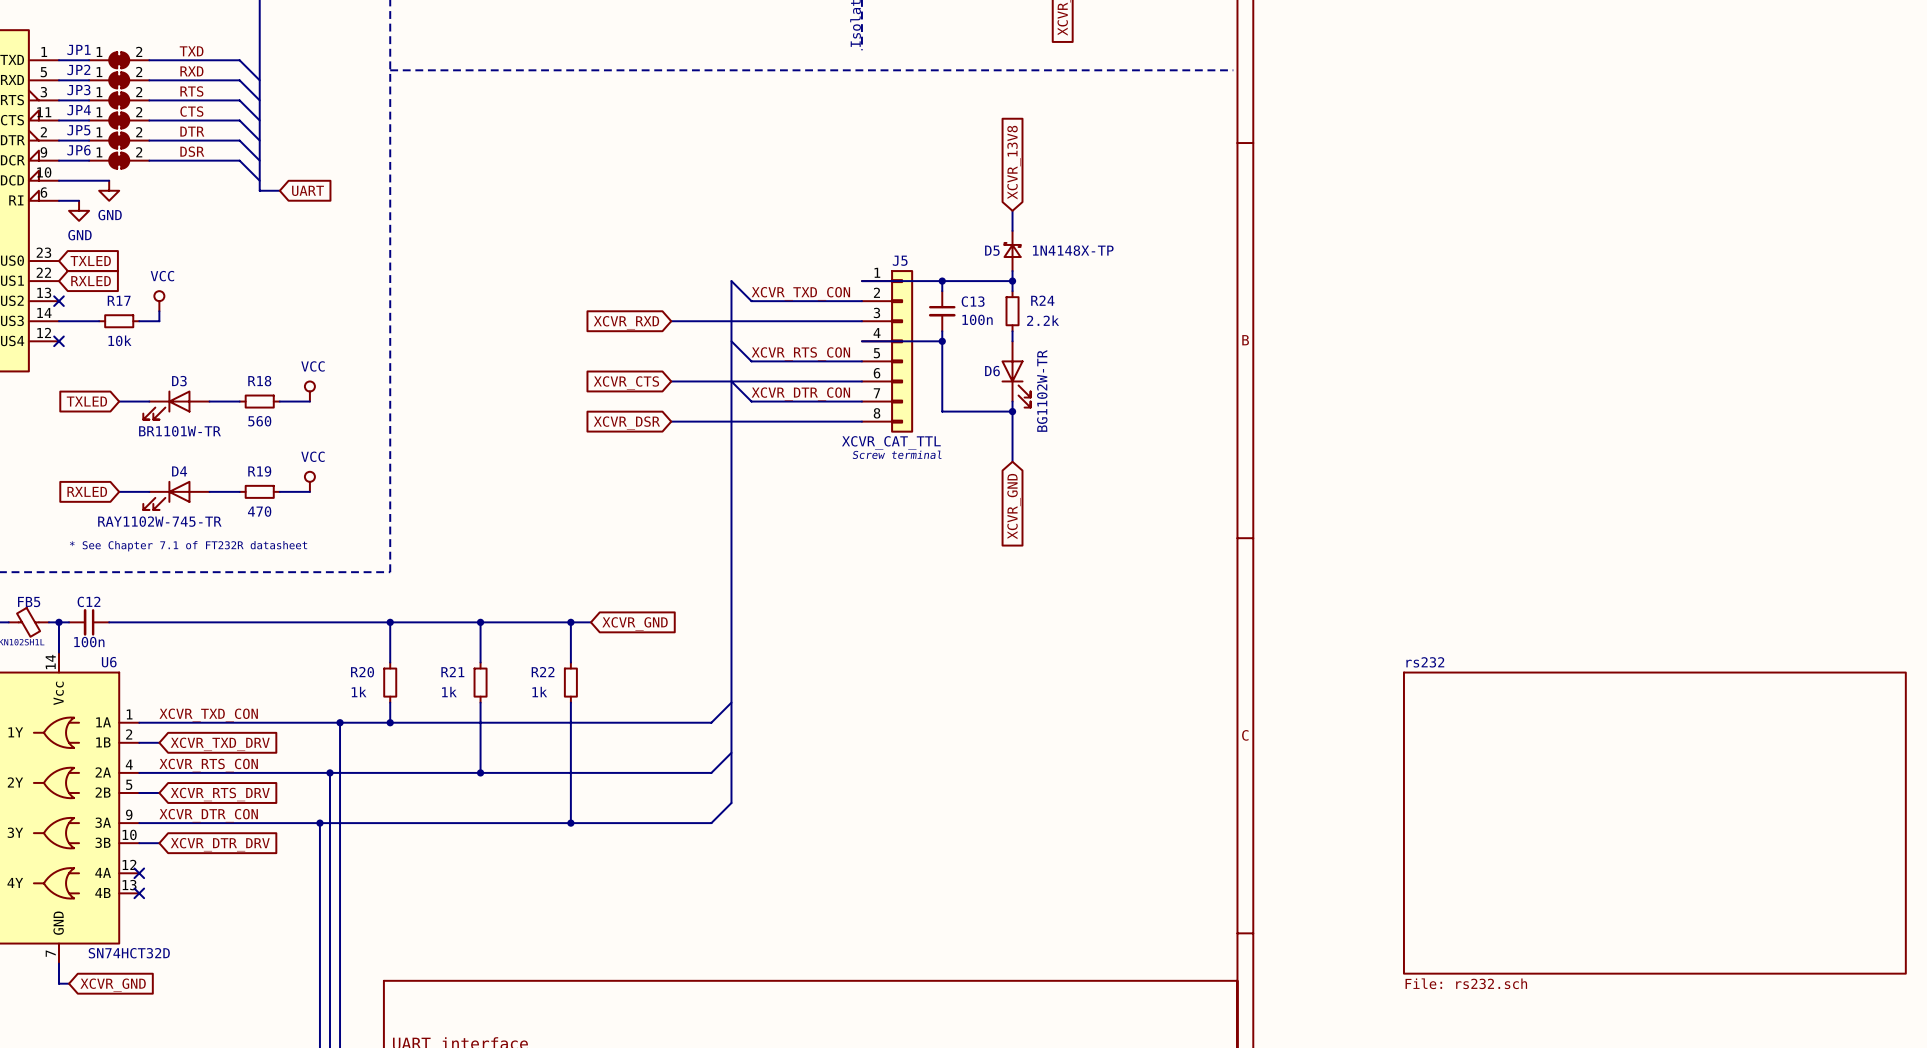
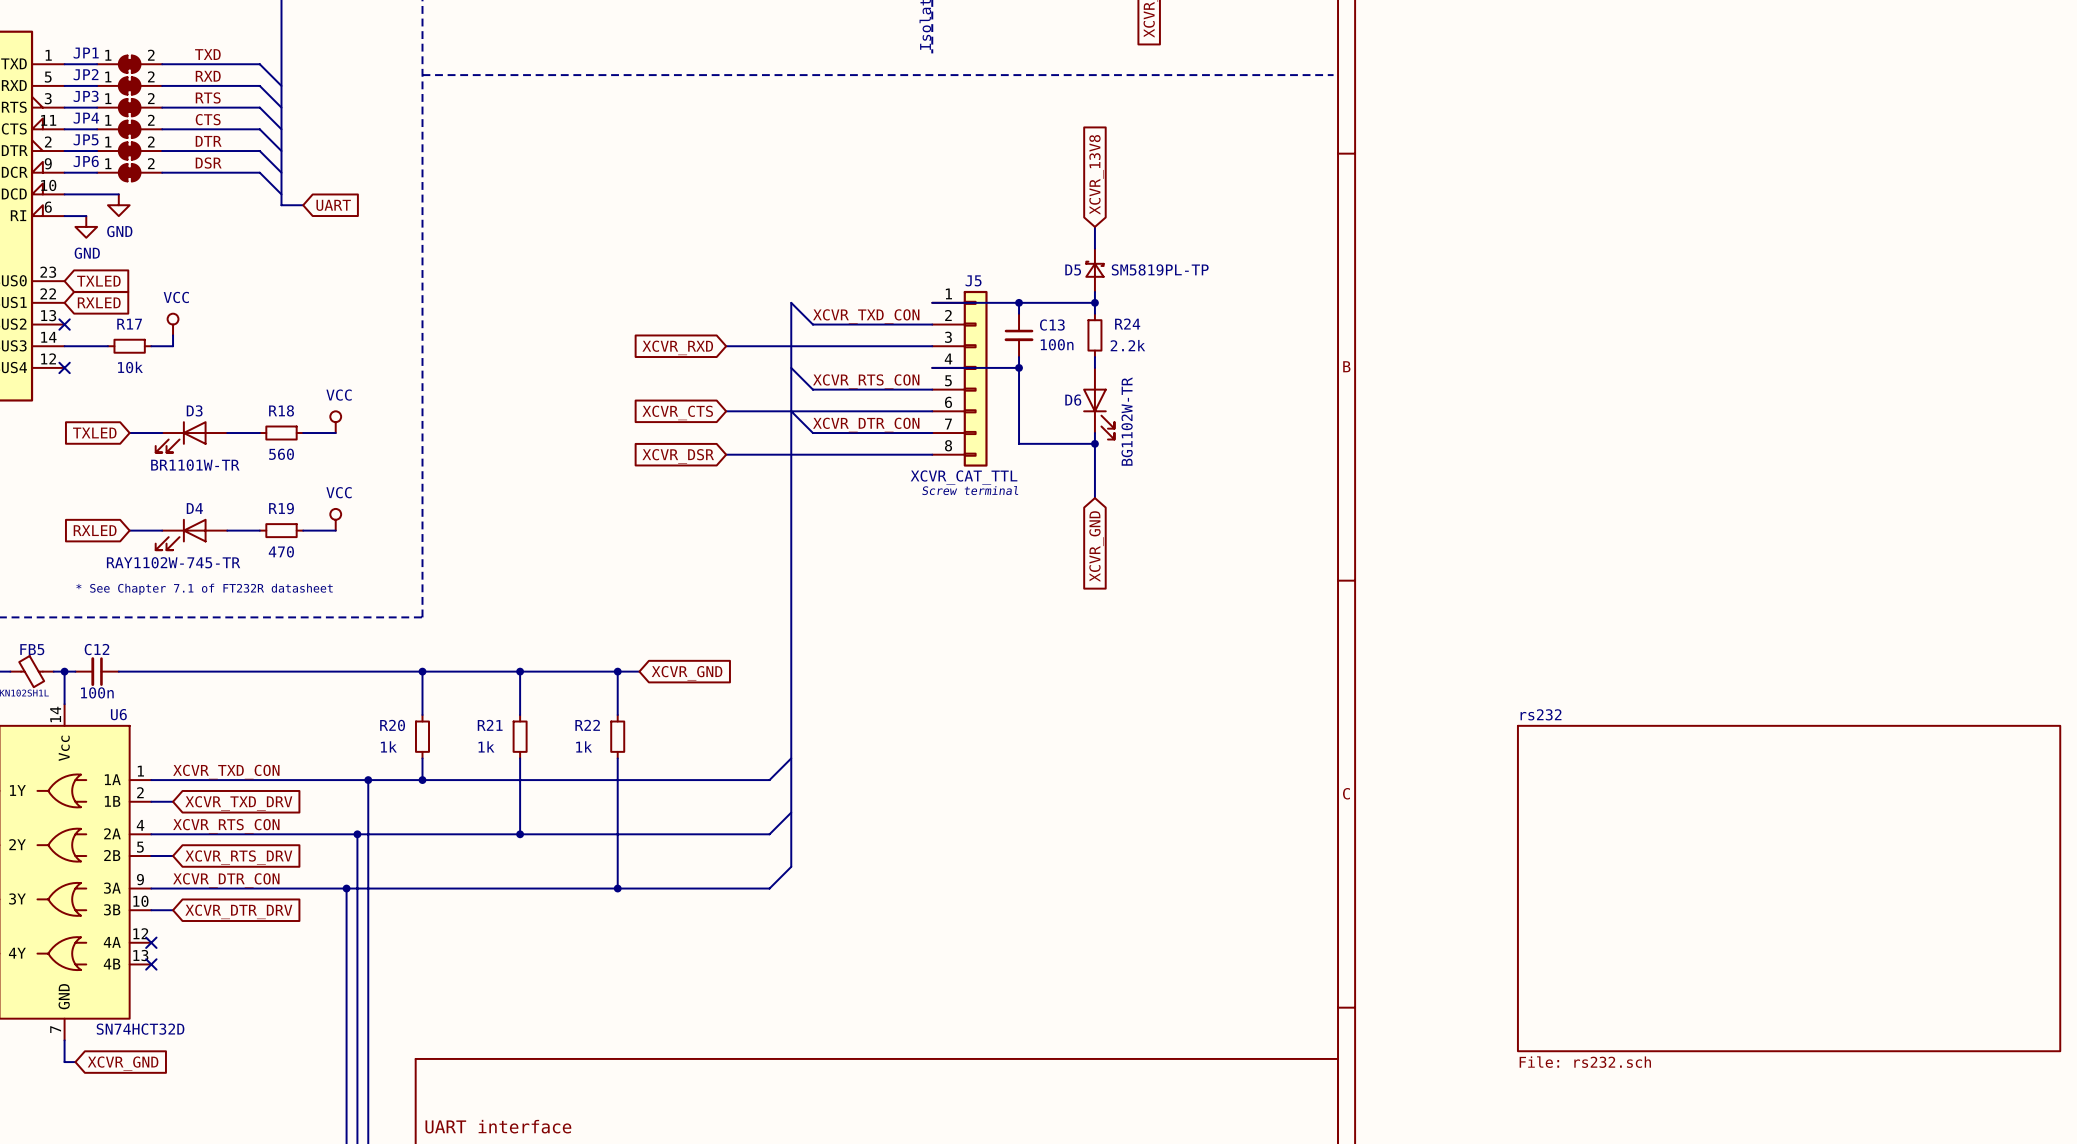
D5 value: 1N4148X-TP (1073, 250) -> SM5819PL-TP (1160, 269)

